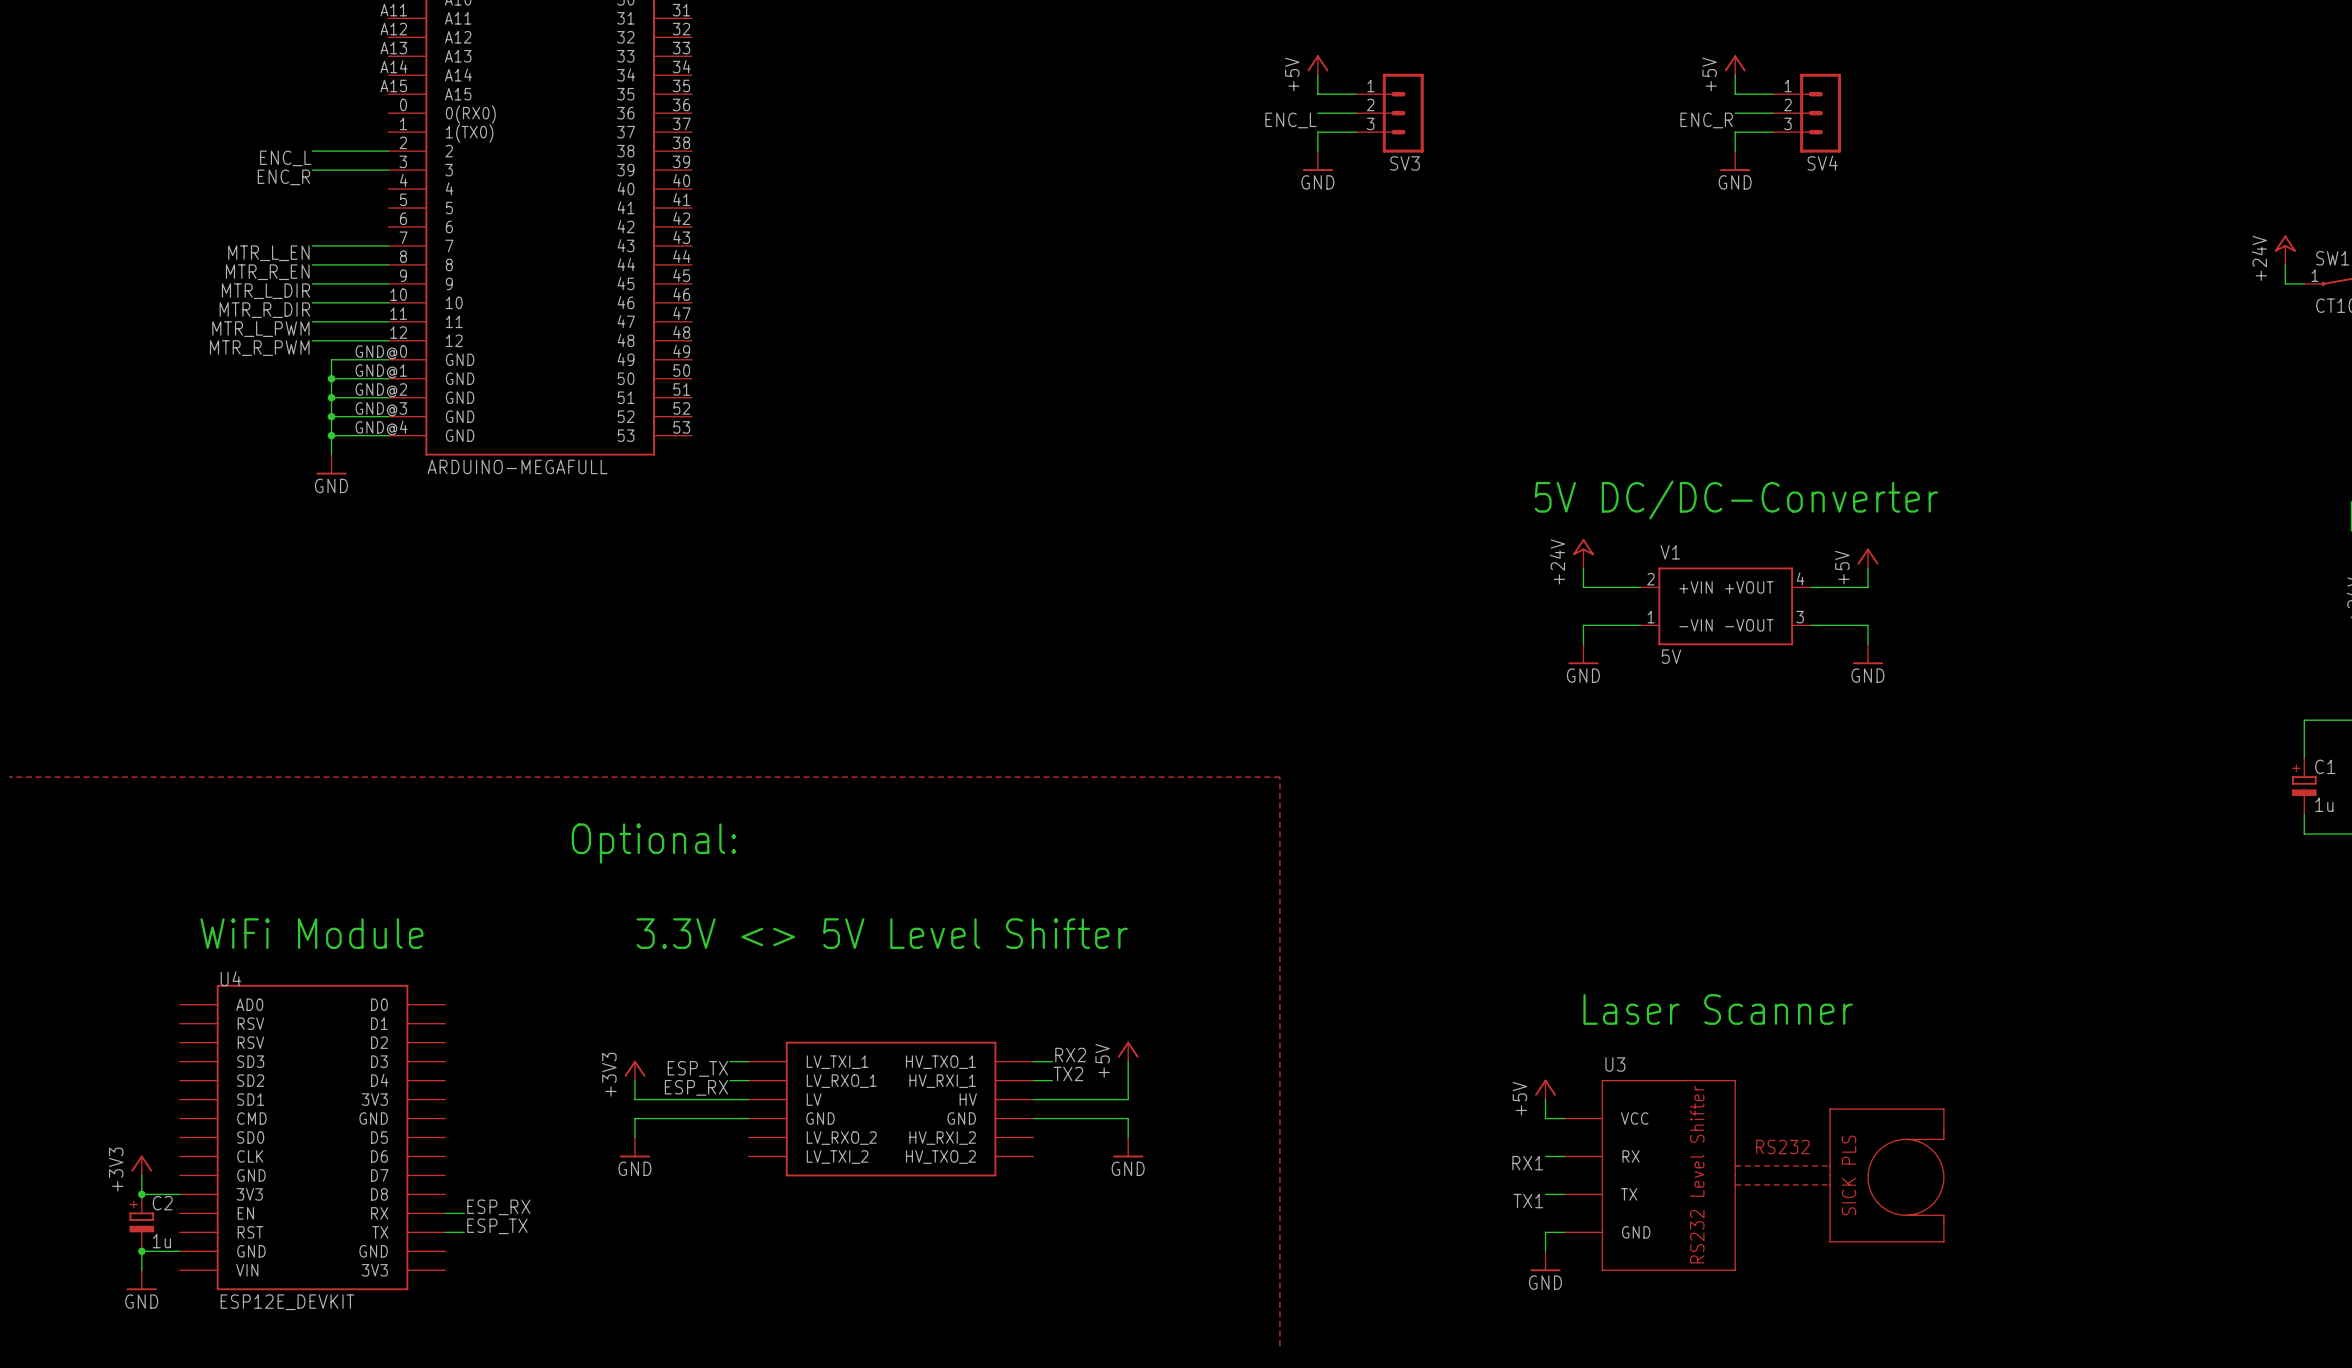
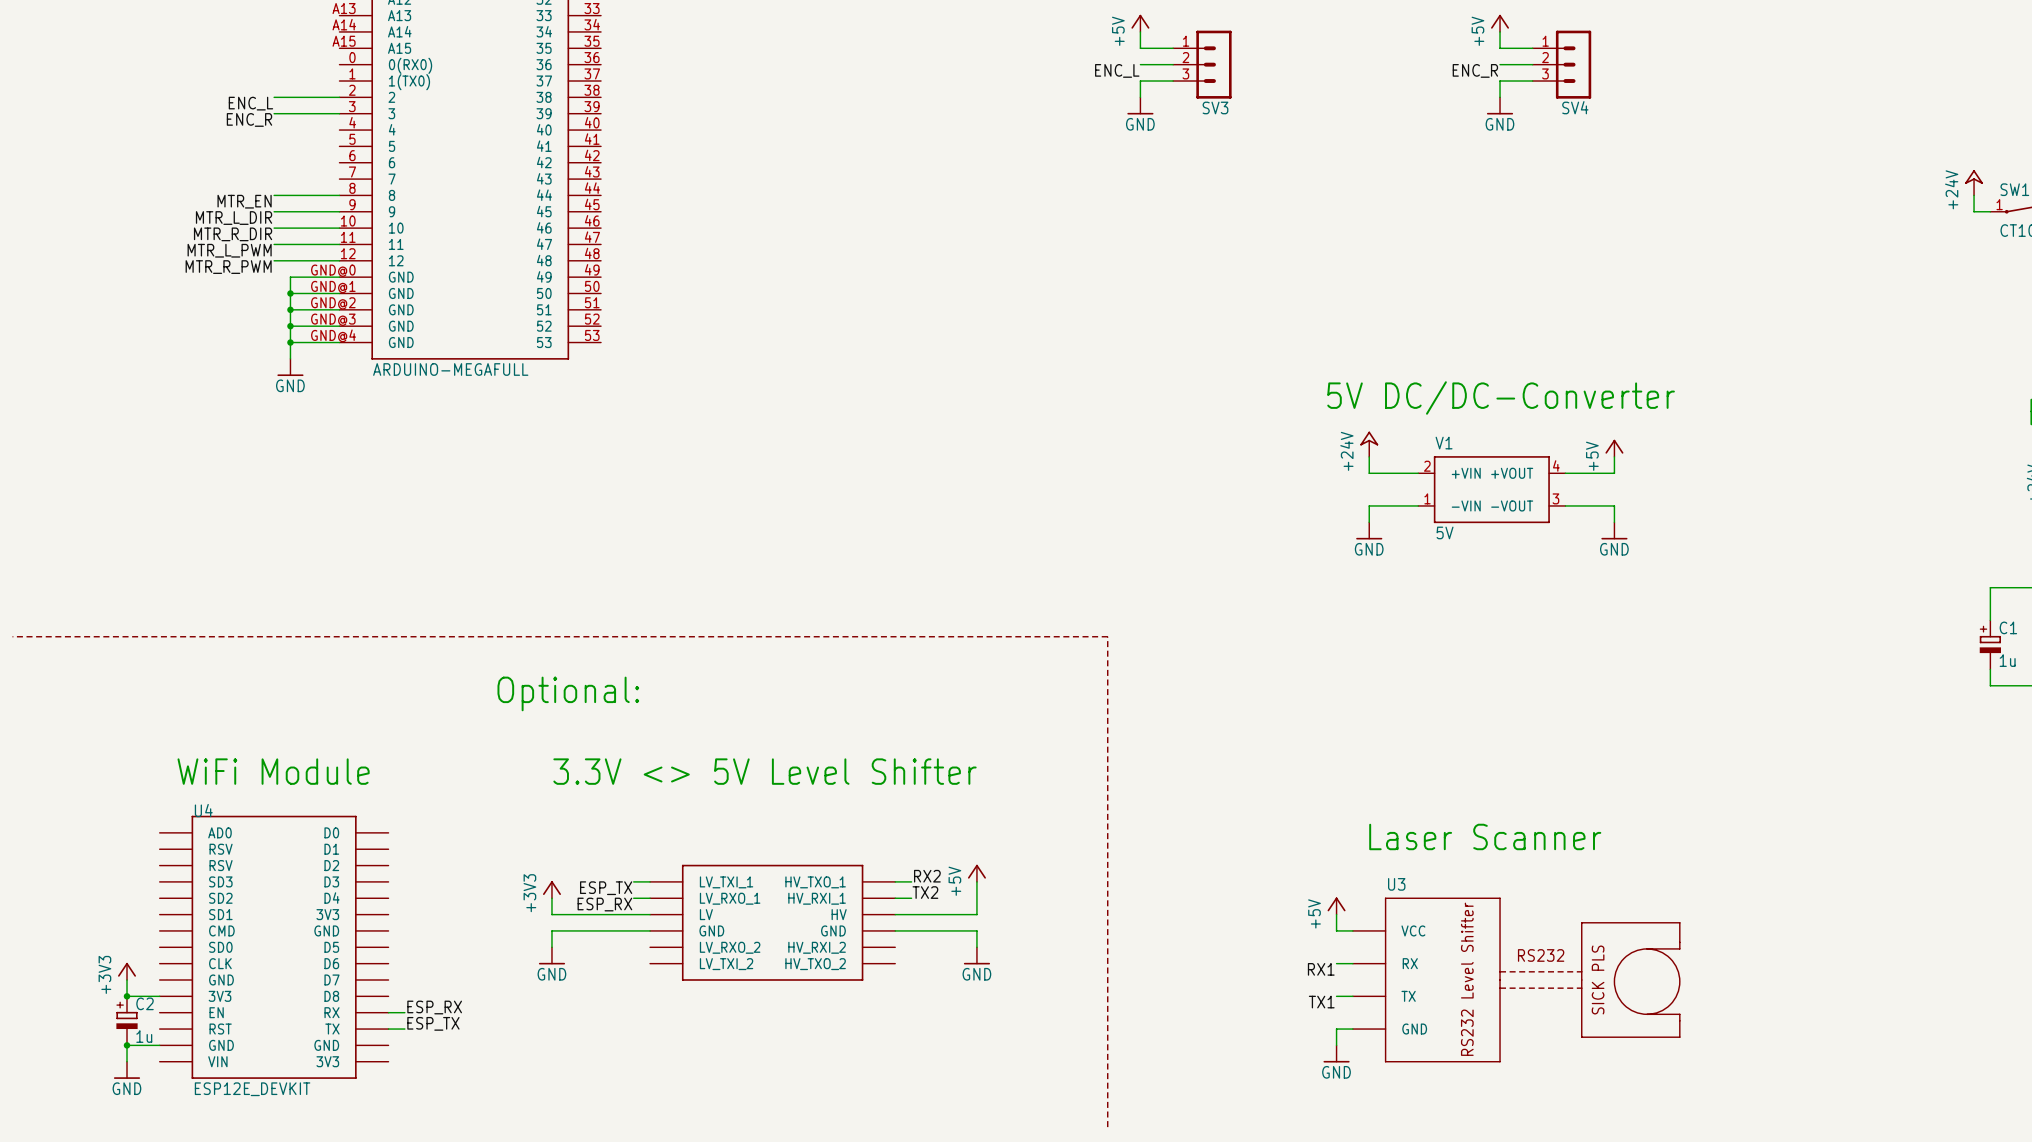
wire: (312, 245) (388, 245) -> none
label: MTR_L_EN (268, 253) -> none
label: MTR_R_EN (267, 272) -> MTR_EN (244, 201)

